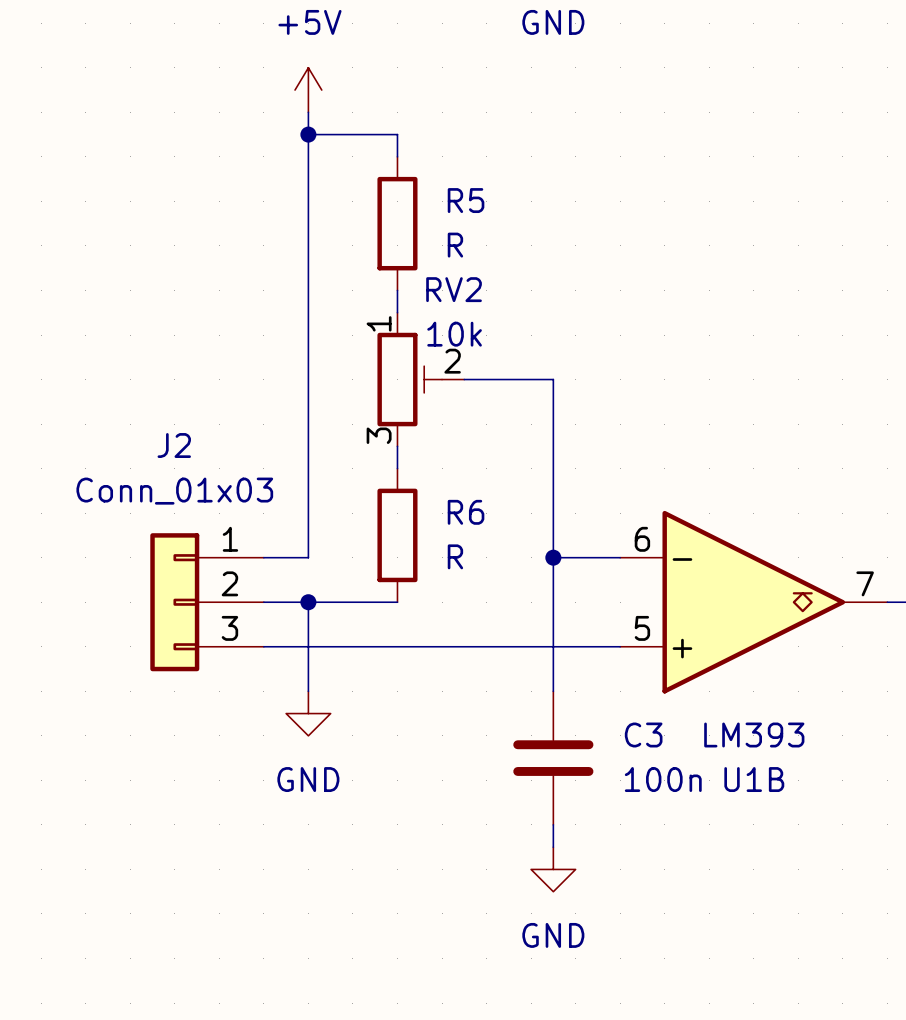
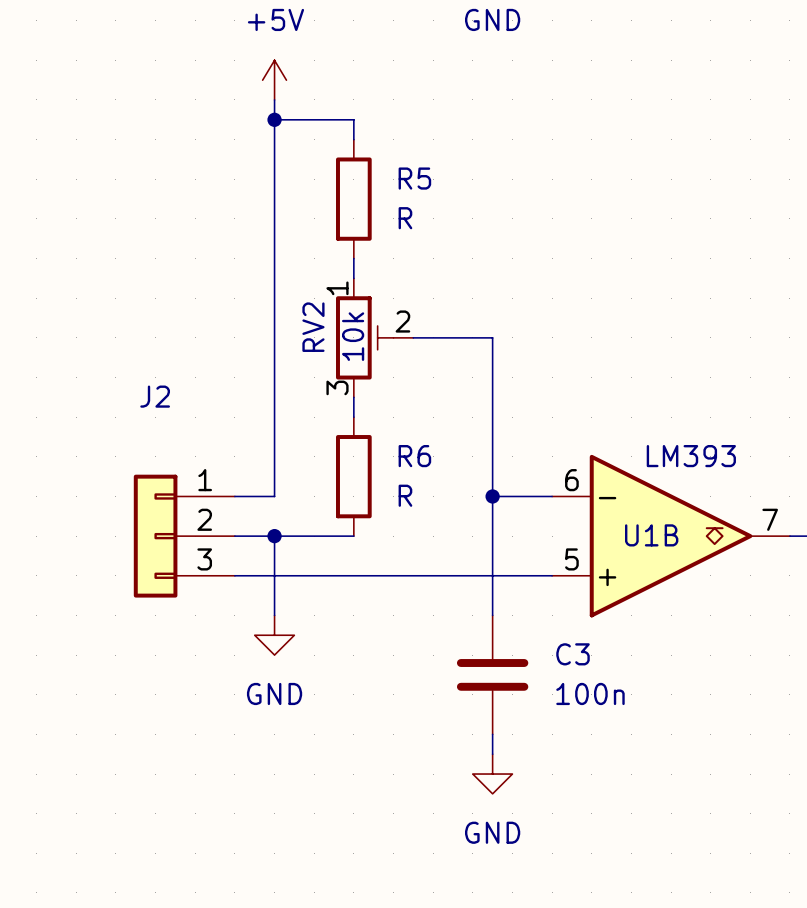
RV2 name rotation: 0° (454, 289) -> 90° counterclockwise (313, 327)
RV2 name position: RV2 (454, 289) -> RV2 (313, 327)
RV2 value rotation: 0° (454, 334) -> 90° counterclockwise (353, 336)
J2 value: Conn_01x03 (174, 491) -> none
U1B value position: LM393 (754, 735) -> LM393 (691, 456)
U1B name position: U1B (754, 779) -> U1B (651, 535)

